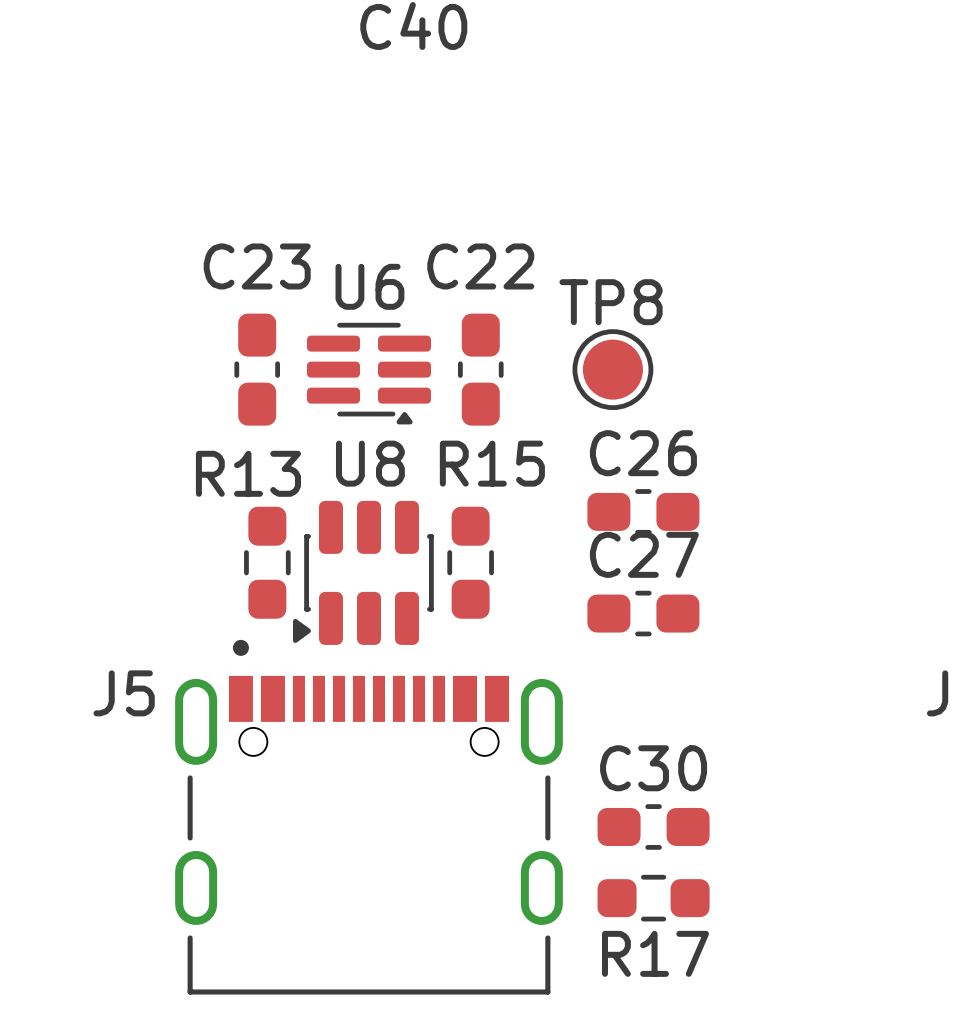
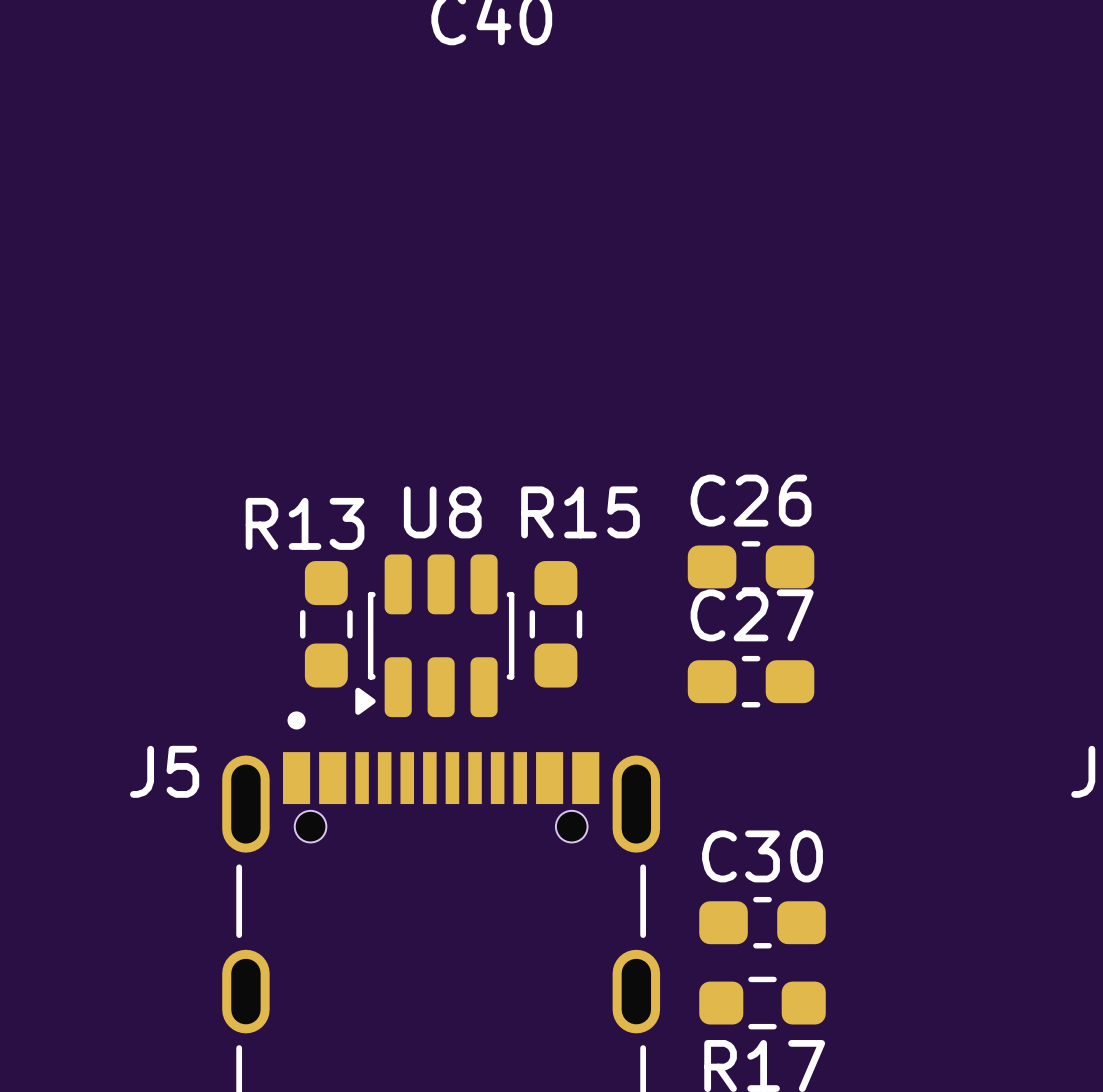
C23: (257, 369) -> none
C22: (480, 369) -> none
TP8: (612, 369) -> none
U6: (368, 373) -> none

